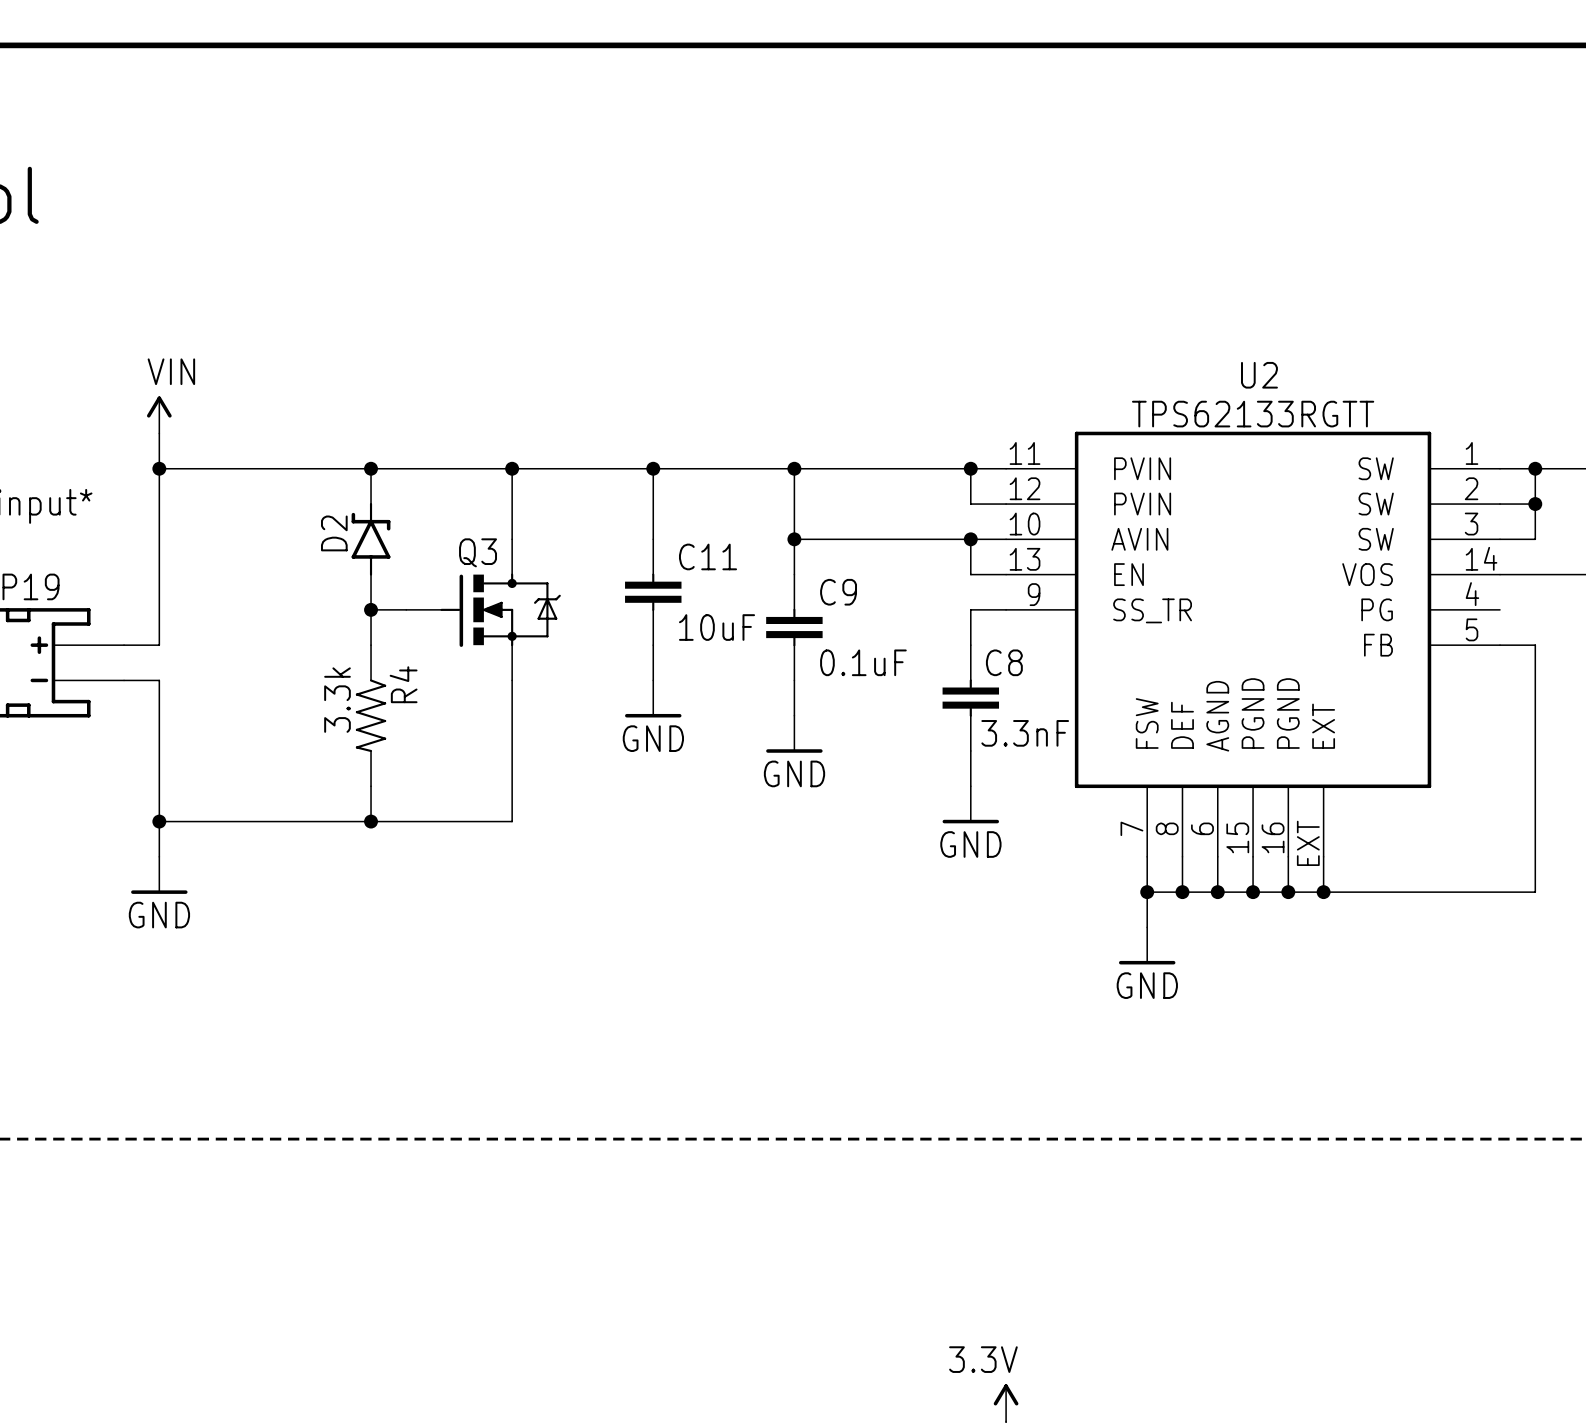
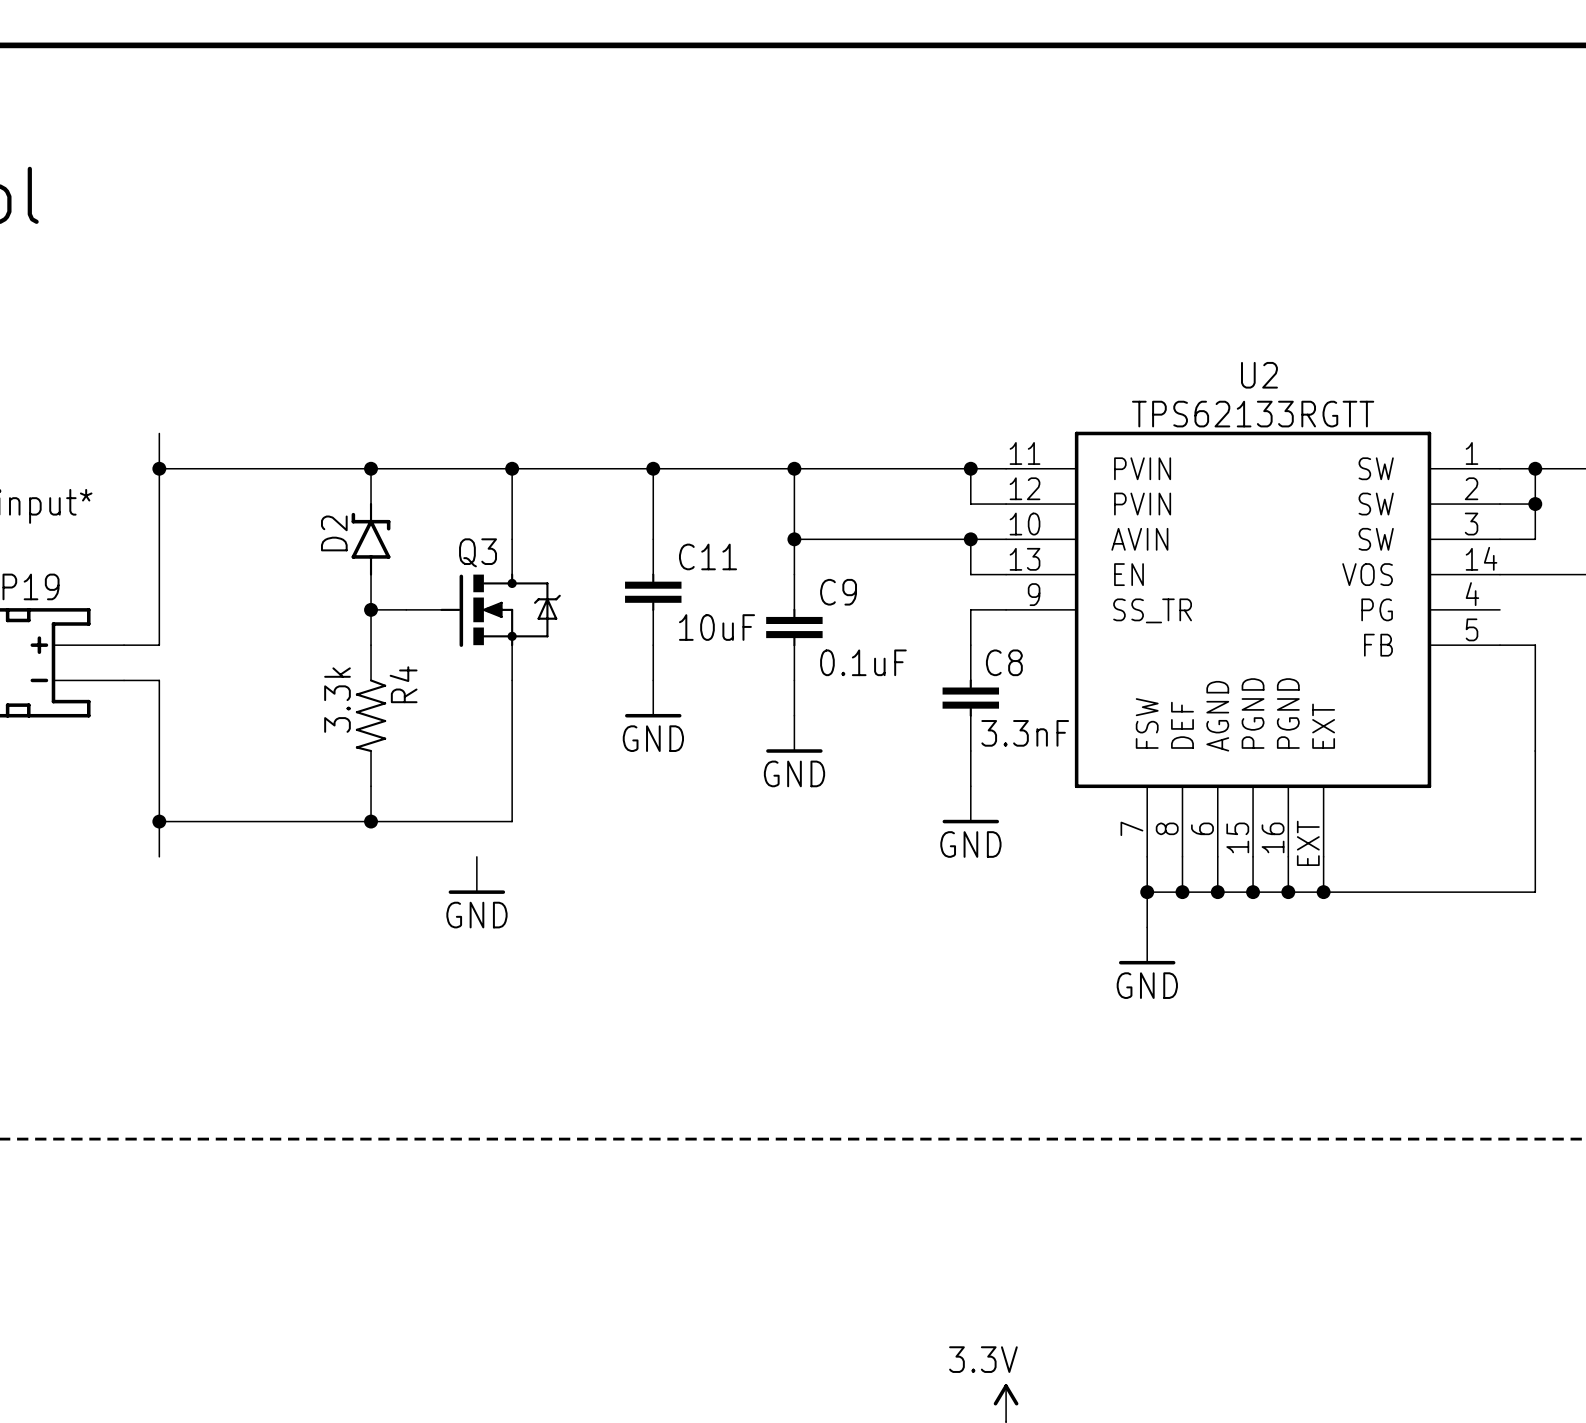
power symbol: VIN (159, 414) -> none
power symbol: GND (159, 875) -> none
power symbol: none -> GND (476, 875)

